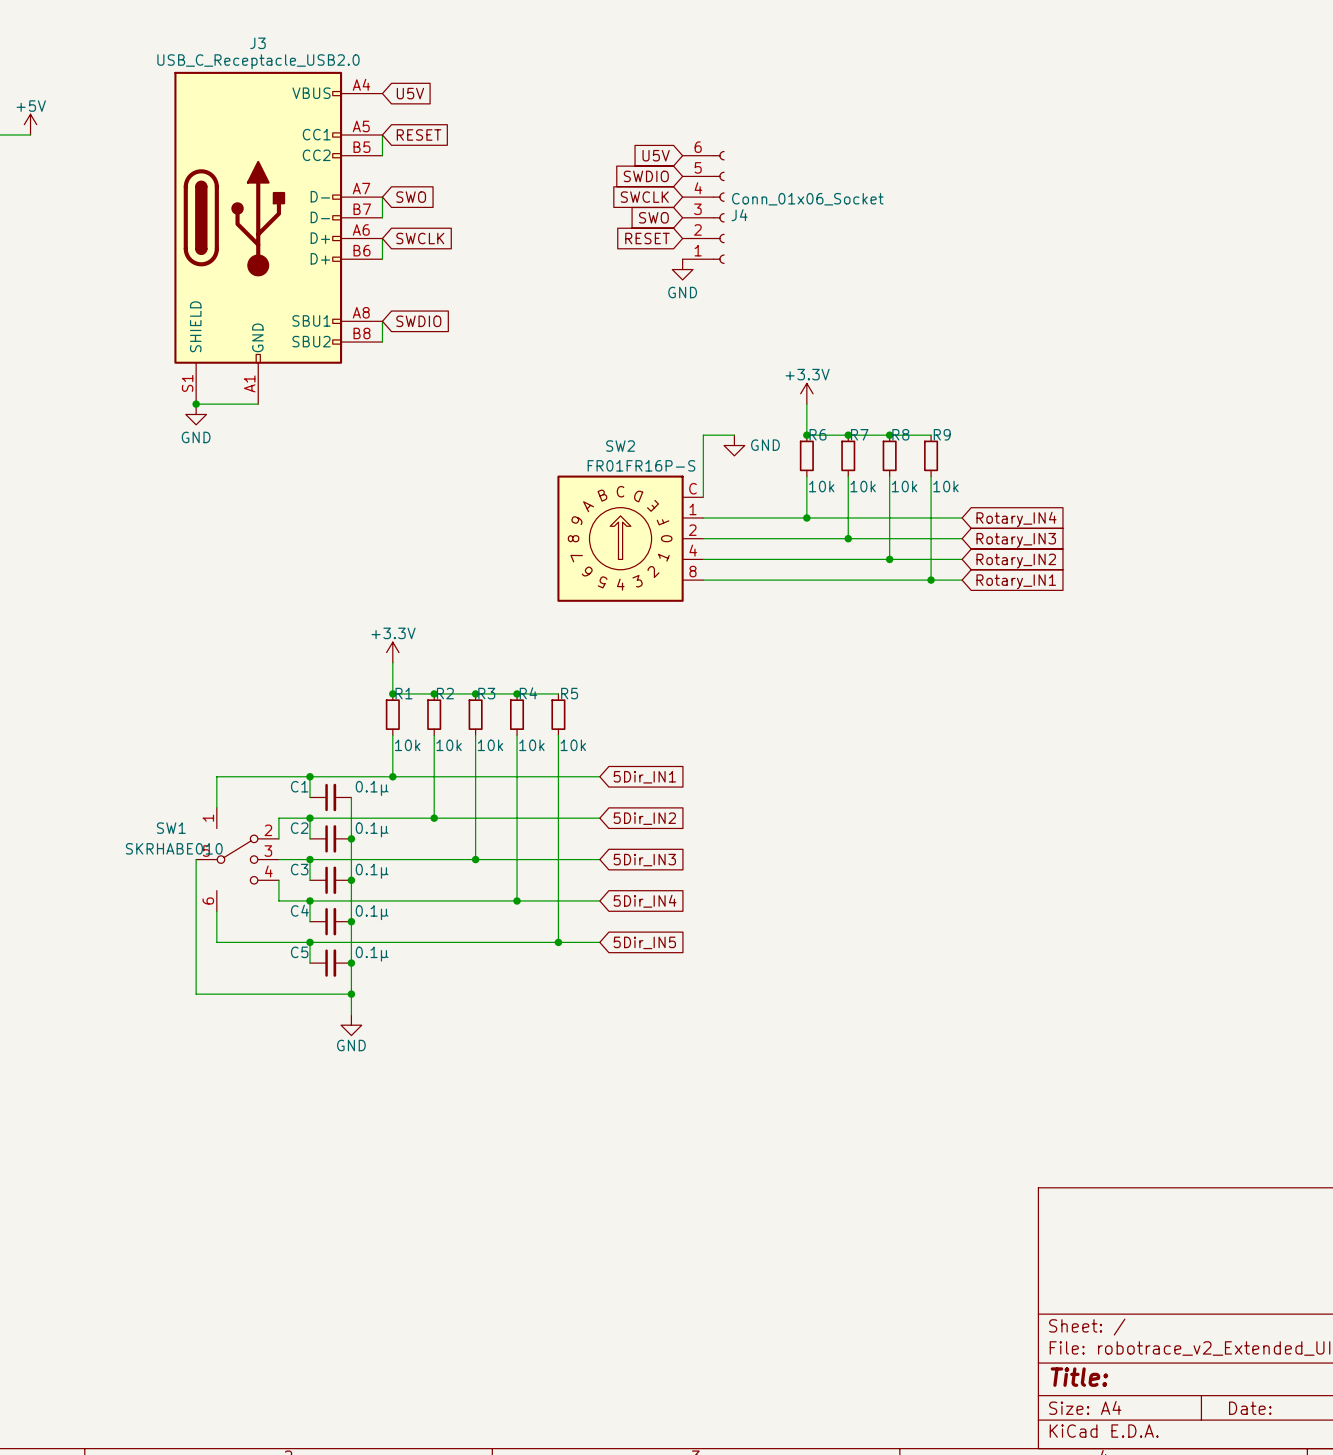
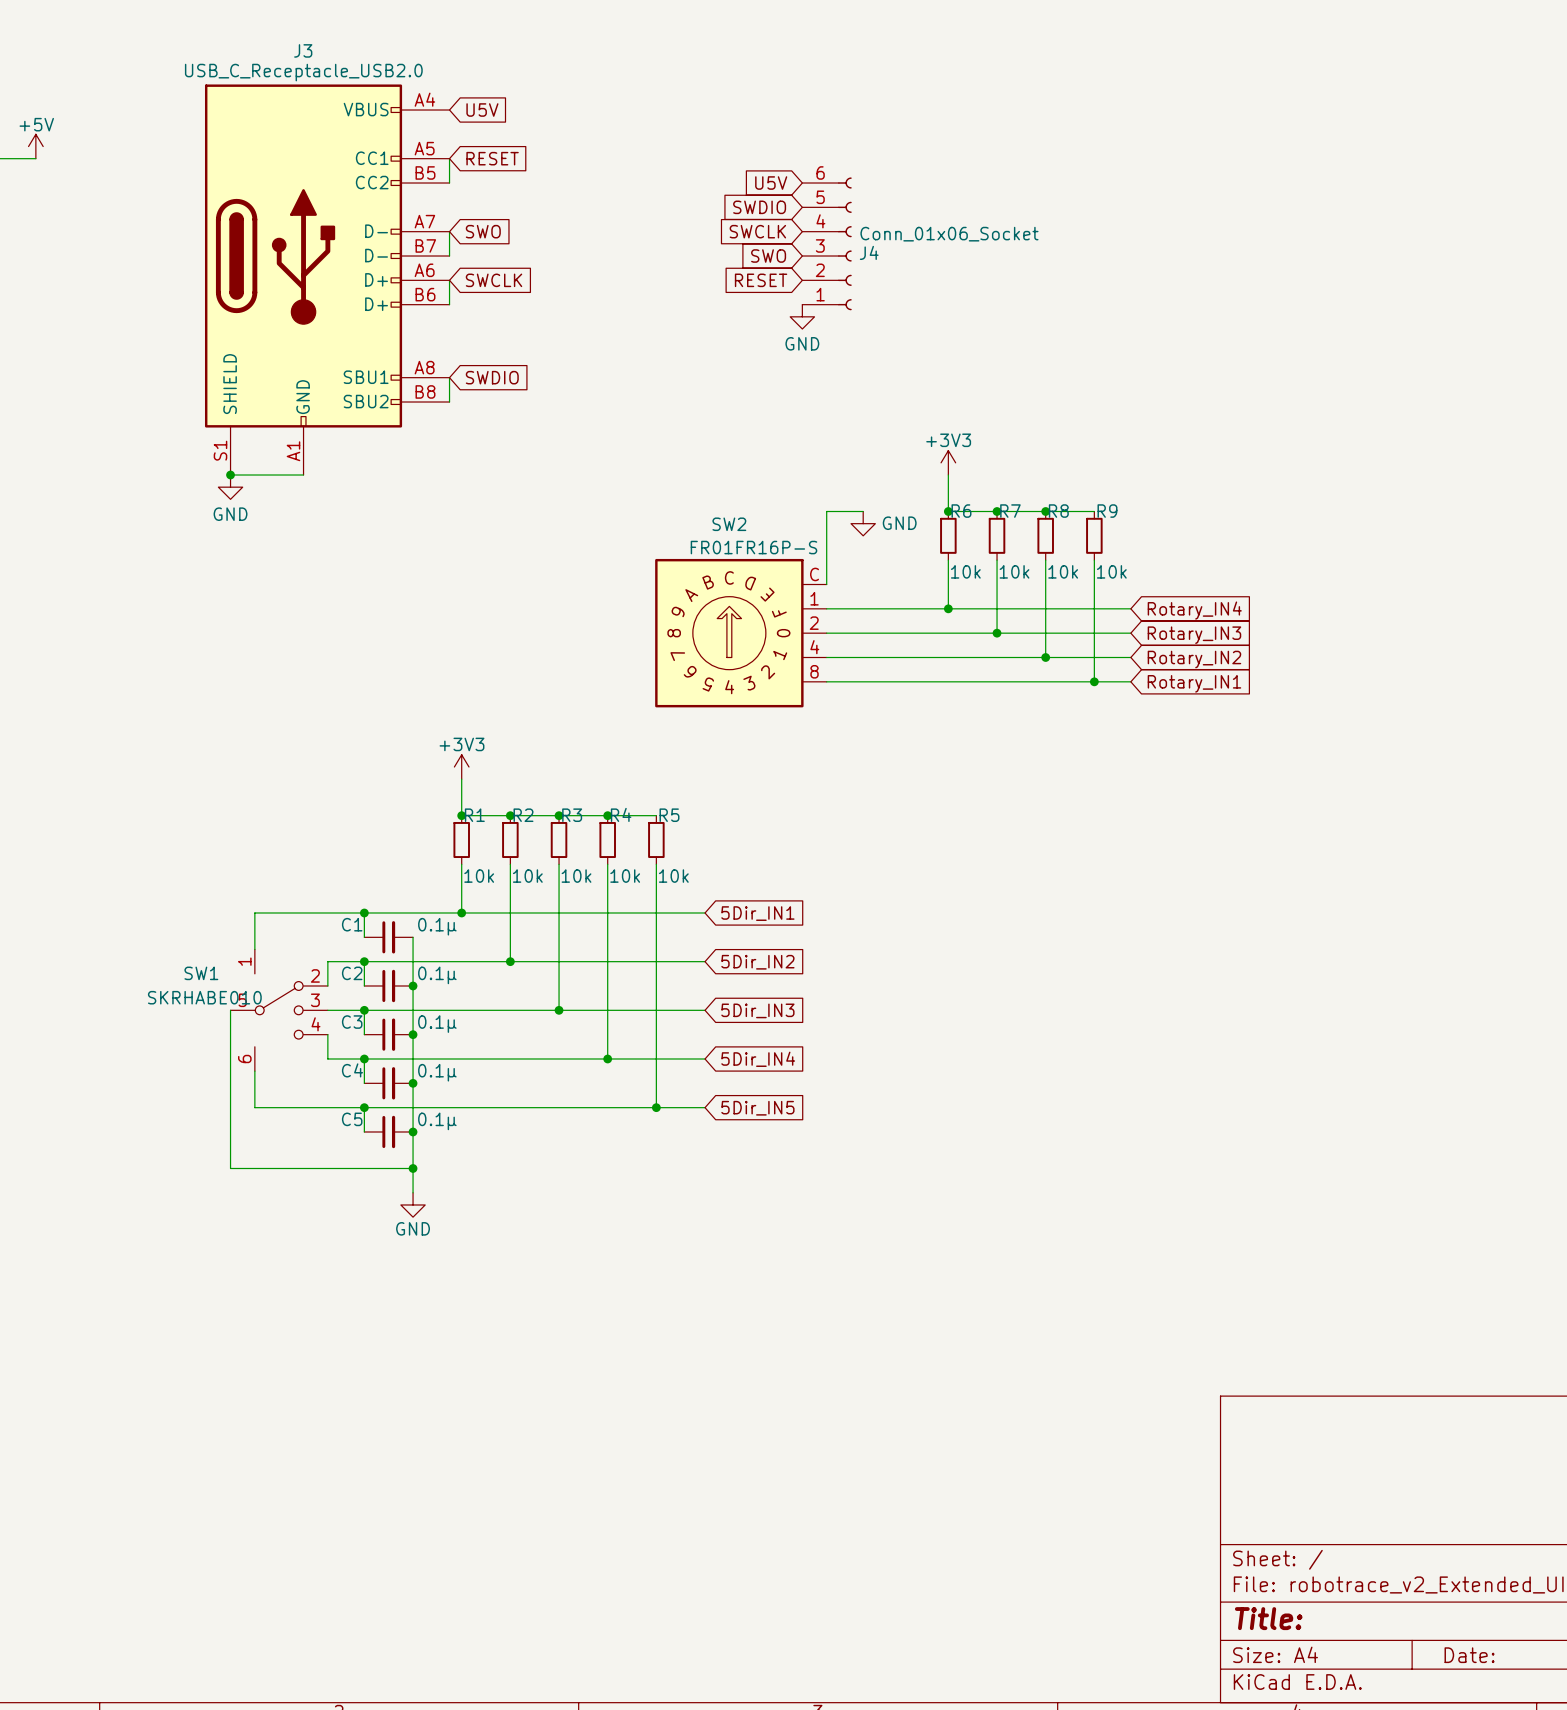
power symbol: +3.3V (806, 393) -> +3V3 (948, 462)
power symbol: +3.3V (392, 652) -> +3V3 (461, 766)

